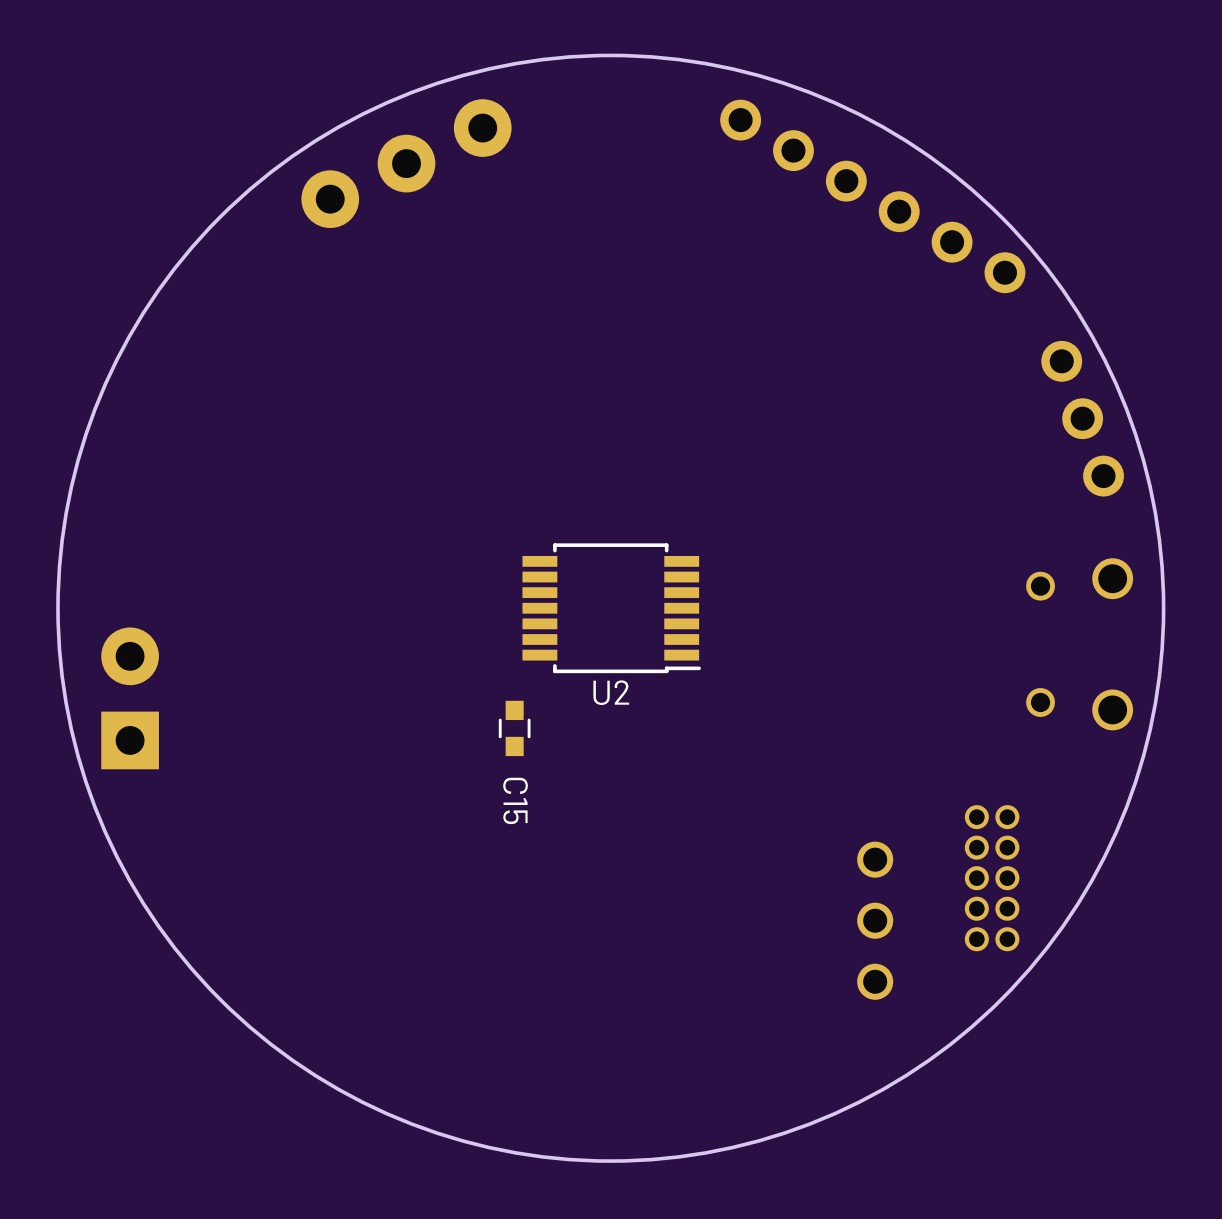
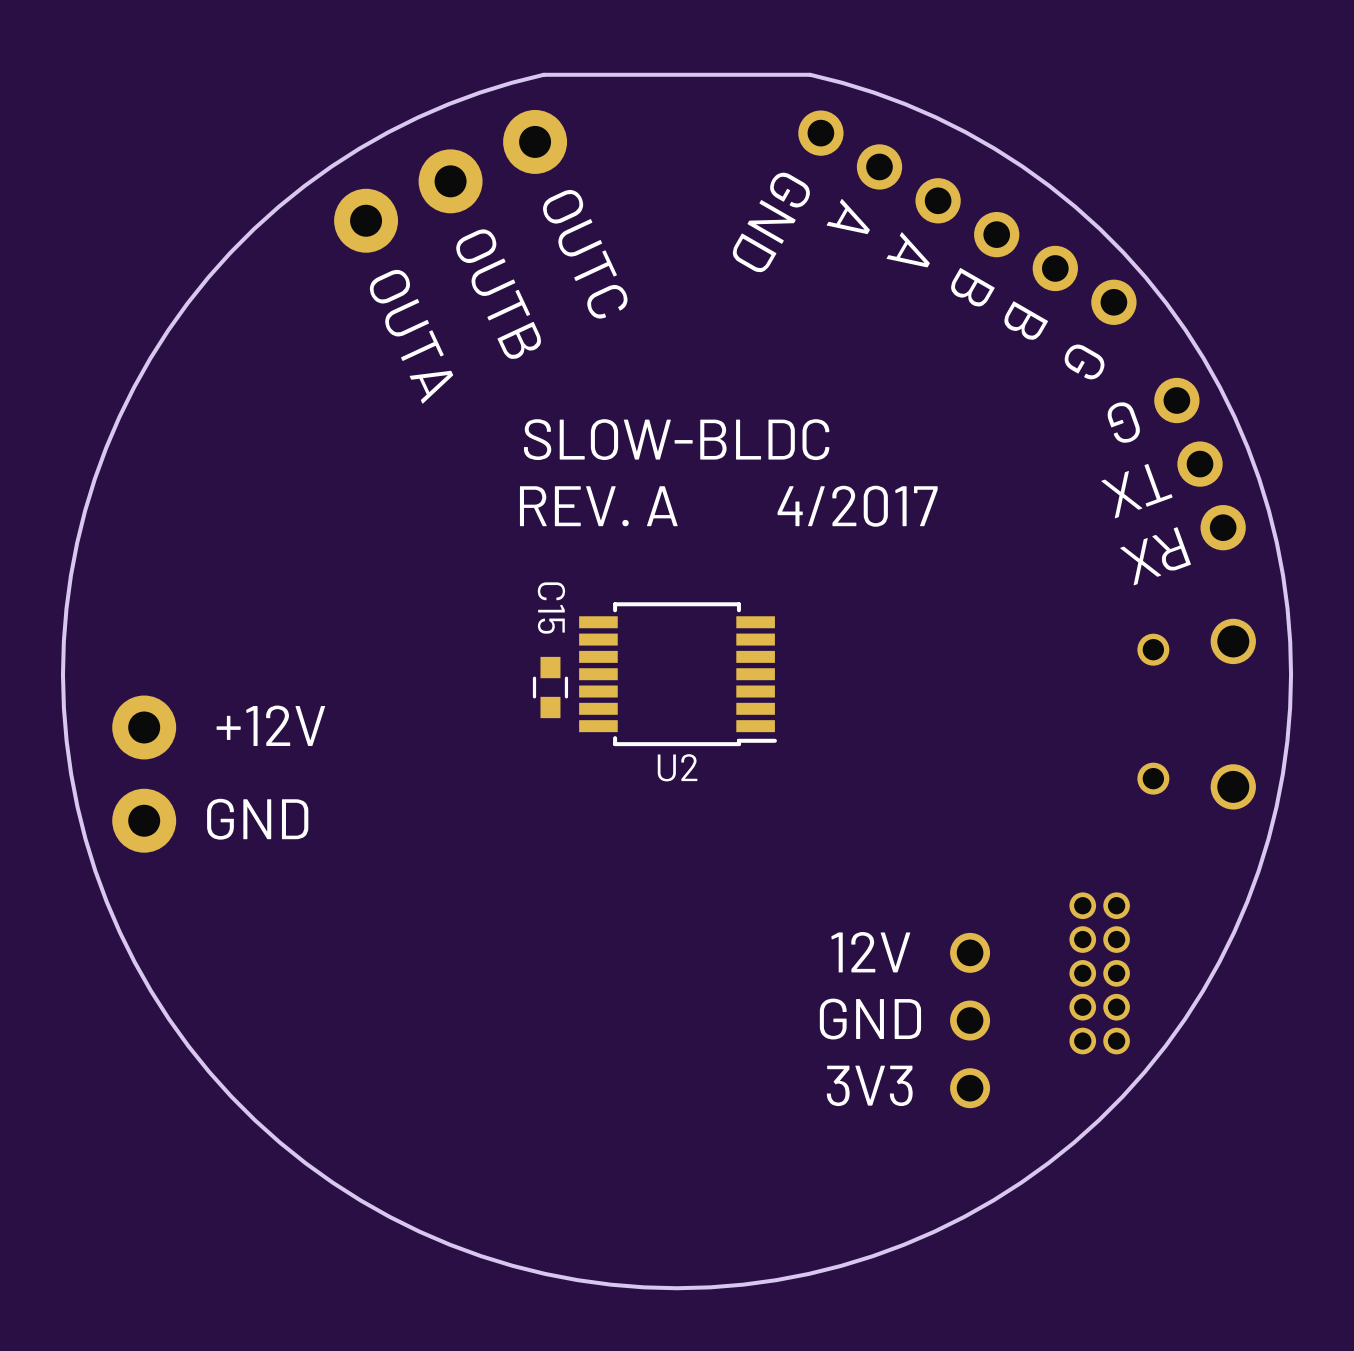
round board edge: [56, 53, 1166, 1163] -> none
board edge: none -> (810, 74) (543, 74) (479, 92) (448, 104) (388, 132) (359, 148) (331, 166) (278, 206) (230, 252) (187, 303) (150, 358) (119, 417) (94, 478) (77, 542) (66, 608) (62, 674) (63, 708) (71, 774) (85, 839) (106, 901) (134, 962) (169, 1019) (209, 1072) (231, 1096) (279, 1142) (332, 1182) (389, 1216) (449, 1244) (512, 1265) (545, 1273) (610, 1284) (677, 1288) (743, 1284) (776, 1280) (841, 1265) (872, 1256) (934, 1231) (993, 1200) (1048, 1163) (1099, 1120) (1122, 1096) (1165, 1046) (1202, 991) (1234, 932) (1258, 870) (1276, 806) (1287, 741) (1291, 674) (1290, 641) (1283, 575) (1268, 510) (1247, 447) (1234, 417) (1203, 358) (1166, 303) (1123, 252) (1075, 206) (1022, 166) (965, 132) (905, 104) (874, 92) (810, 74)
text: none -> A (848, 216)
text: none -> GND (771, 222)
text: none -> A (908, 249)
text: none -> OUTC (585, 254)
text: none -> B (972, 287)
text: none -> OUTB (498, 294)
text: none -> B (1025, 320)
text: none -> OUTA (411, 336)
text: none -> G (1084, 361)
text: none -> G (1123, 422)
text: none -> SLOW-BLDC (676, 439)
text: none -> TX (1136, 491)
text: none -> REV. A (598, 506)
text: none -> 4/2017 (857, 506)
text: none -> RX (1155, 556)
part footprint: [101, 627, 159, 770] -> [112, 695, 177, 853]
text: none -> +12V (270, 725)
C15 position: (514, 728) -> (550, 687)
text: none -> GND (257, 819)
C15 name position: C15 (515, 800) -> C15 (551, 608)
text: none -> 12V (870, 952)
text: none -> GND (870, 1019)
text: none -> 3V3 (869, 1085)

